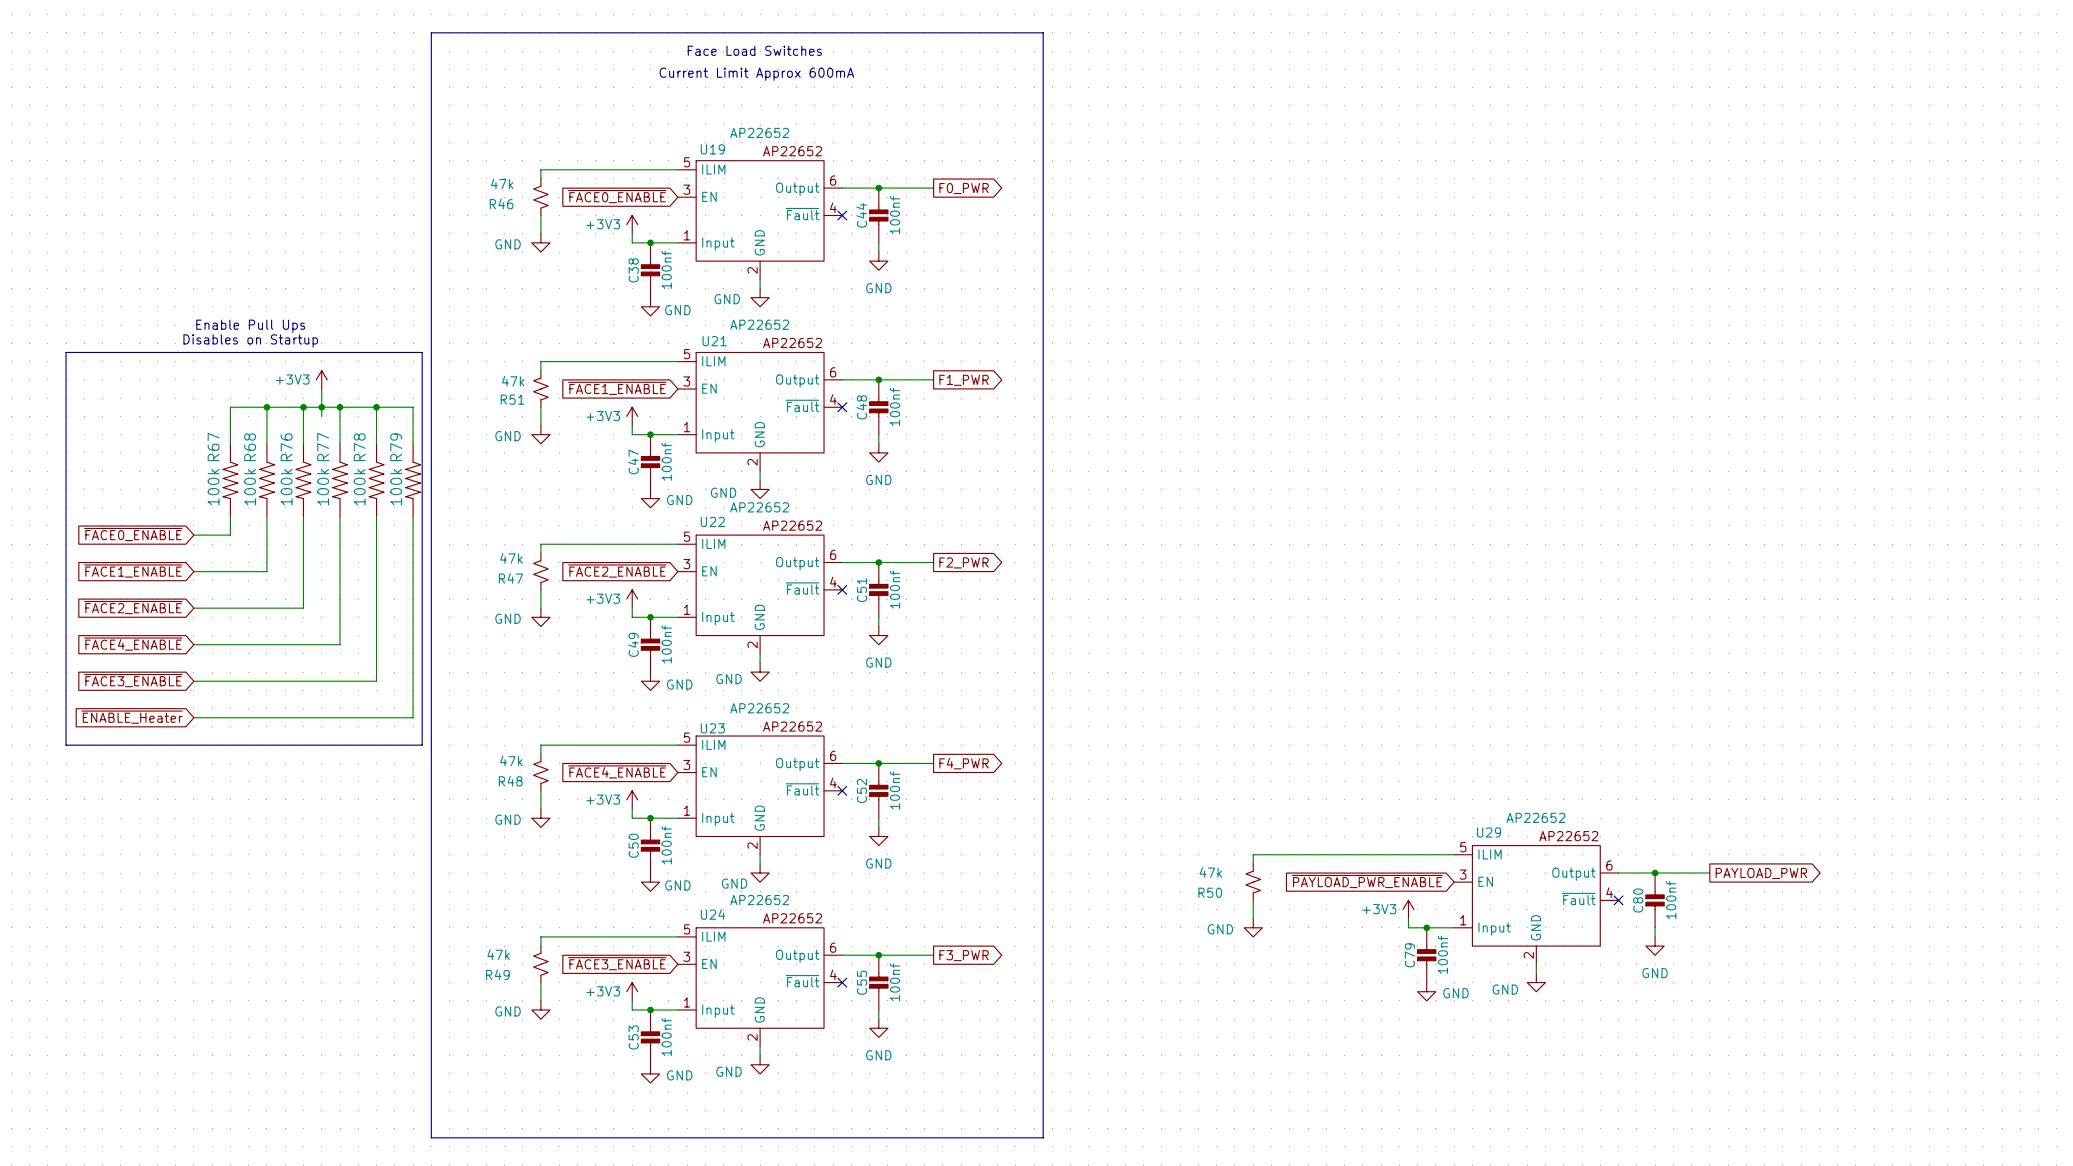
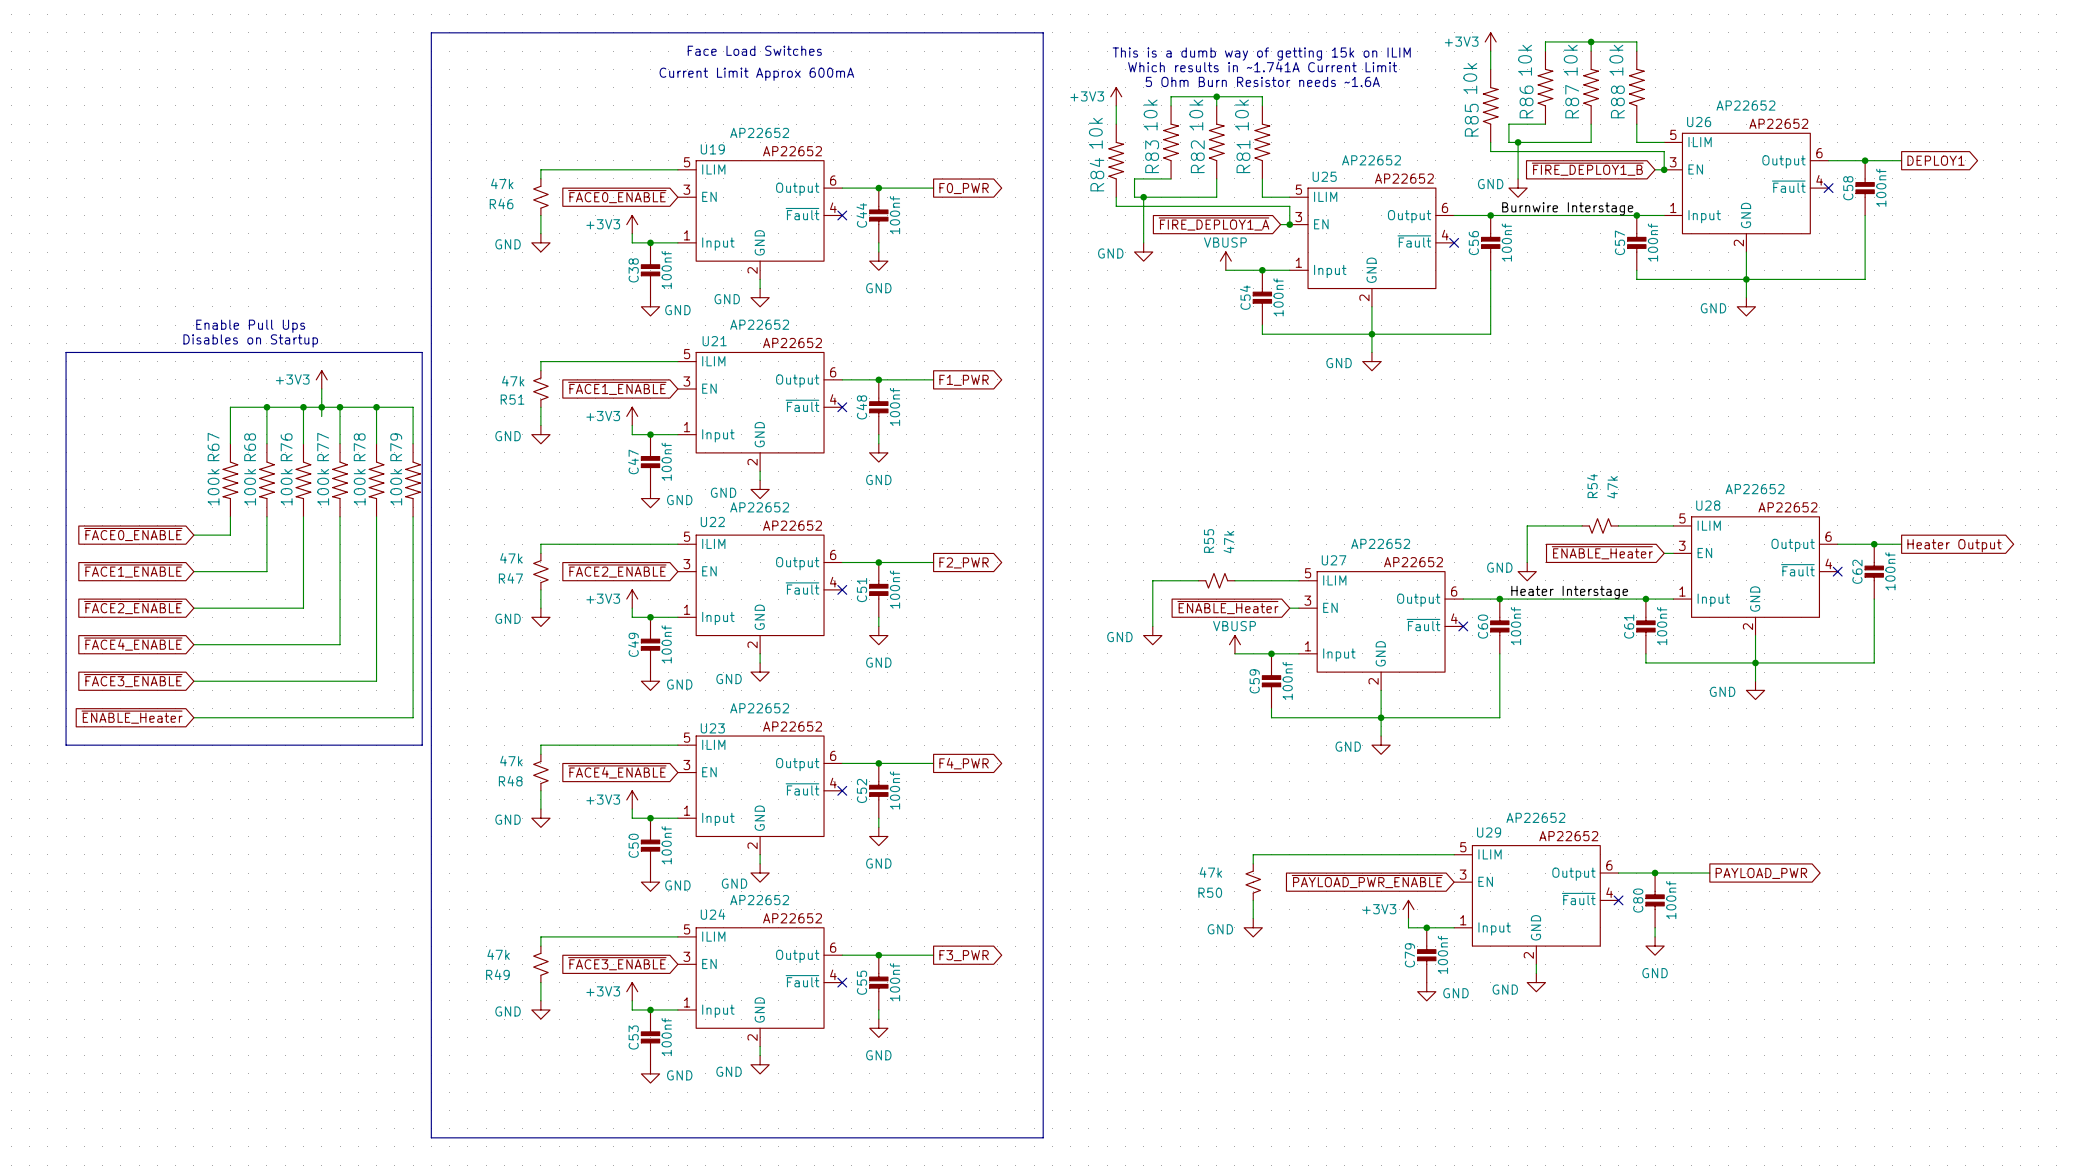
power symbol: none -> +3V3 (1490, 41)
wire: none -> (1591, 41) (1591, 51)
junction: none -> (1591, 41)
wire: none -> (1490, 51) (1490, 69)
wire: none -> (1545, 51) (1545, 41) (1636, 41) (1636, 51)
text: none -> This is a dumb way of getting 15k on ILIM (1261, 54)
text: none -> Which results in ~1.741A Current Limit (1262, 67)
text: none -> 5 Ohm Burn Resistor needs ~1.6A (1262, 81)
R86: none -> 10k (1545, 87)
R87: none -> 10k (1591, 87)
R88: none -> 10k (1636, 87)
power symbol: none -> +3V3 (1116, 96)
wire: none -> (1216, 96) (1216, 105)
junction: none -> (1216, 96)
wire: none -> (1116, 105) (1116, 124)
wire: none -> (1171, 105) (1171, 96) (1262, 96) (1262, 105)
R85: none -> 10k (1490, 105)
wire: none -> (1545, 124) (1508, 124) (1508, 142) (1591, 142) (1591, 124)
wire: none -> (1636, 124) (1636, 142) (1664, 142)
R83: none -> 10k (1171, 142)
R82: none -> 10k (1216, 142)
R81: none -> 10k (1262, 142)
wire: none -> (1490, 142) (1490, 151) (1664, 151) (1664, 169) (1655, 169)
wire: none -> (1518, 142) (1518, 178)
junction: none -> (1518, 142)
R84: none -> 10k (1116, 160)
wire: none -> (1828, 160) (1901, 160)
junction: none -> (1865, 160)
global label: none -> DEPLOY1 (1936, 160)
global label: none -> ~{FIRE_DEPLOY1_B} (1587, 169)
junction: none -> (1664, 169)
wire: none -> (1171, 178) (1134, 178) (1134, 197) (1216, 197) (1216, 178)
wire: none -> (1262, 178) (1262, 197) (1289, 197)
power symbol: none -> GND (1518, 188)
no-connect mark: none -> (1828, 188)
C58: none -> 100nf (1865, 188)
U26: none -> AP22652 (1746, 192)
wire: none -> (1116, 197) (1116, 206) (1289, 206) (1289, 224) (1280, 224)
wire: none -> (1143, 197) (1143, 242)
junction: none -> (1143, 197)
label: none -> Burnwire Interstage (1567, 208)
wire: none -> (1454, 215) (1664, 215)
junction: none -> (1490, 215)
junction: none -> (1636, 215)
wire: none -> (1865, 215) (1865, 279) (1636, 279) (1636, 270)
global label: none -> ~{FIRE_DEPLOY1_A} (1214, 224)
junction: none -> (1289, 224)
no-connect mark: none -> (1454, 242)
C56: none -> 100nf (1490, 242)
C57: none -> 100nf (1636, 242)
U25: none -> AP22652 (1371, 247)
power symbol: none -> GND (1143, 252)
wire: none -> (1746, 252) (1746, 297)
power symbol: none -> VBUSP (1225, 261)
wire: none -> (1225, 270) (1289, 270)
junction: none -> (1262, 270)
wire: none -> (1490, 270) (1490, 334) (1262, 334) (1262, 325)
junction: none -> (1746, 279)
C54: none -> 100nf (1262, 297)
wire: none -> (1371, 306) (1371, 352)
power symbol: none -> GND (1746, 306)
junction: none -> (1371, 334)
power symbol: none -> GND (1371, 361)
wire: none -> (1582, 525) (1527, 525) (1527, 562)
R54: none -> 47k (1600, 525)
wire: none -> (1618, 525) (1673, 525)
wire: none -> (1837, 544) (1901, 544)
junction: none -> (1874, 544)
global label: none -> Heater Output (1954, 545)
global label: none -> ~{ENABLE_Heater} (1602, 552)
wire: none -> (1664, 553) (1673, 553)
power symbol: none -> GND (1527, 571)
no-connect mark: none -> (1837, 571)
C62: none -> 100nf (1874, 571)
U28: none -> AP22652 (1755, 576)
wire: none -> (1198, 580) (1152, 580) (1152, 626)
R55: none -> 47k (1216, 580)
wire: none -> (1234, 580) (1298, 580)
label: none -> Heater Interstage (1569, 592)
wire: none -> (1463, 599) (1673, 599)
junction: none -> (1499, 599)
junction: none -> (1645, 599)
wire: none -> (1874, 599) (1874, 662) (1645, 662) (1645, 653)
global label: none -> ~{ENABLE_Heater} (1227, 607)
wire: none -> (1289, 608) (1298, 608)
no-connect mark: none -> (1463, 626)
C60: none -> 100nf (1499, 626)
C61: none -> 100nf (1645, 626)
U27: none -> AP22652 (1381, 631)
power symbol: none -> GND (1152, 635)
wire: none -> (1755, 635) (1755, 681)
power symbol: none -> VBUSP (1234, 644)
wire: none -> (1234, 653) (1298, 653)
junction: none -> (1271, 653)
wire: none -> (1499, 653) (1499, 717) (1271, 717) (1271, 708)
junction: none -> (1755, 662)
C59: none -> 100nf (1271, 681)
wire: none -> (1381, 690) (1381, 736)
power symbol: none -> GND (1755, 690)
junction: none -> (1381, 717)
power symbol: none -> GND (1381, 745)

